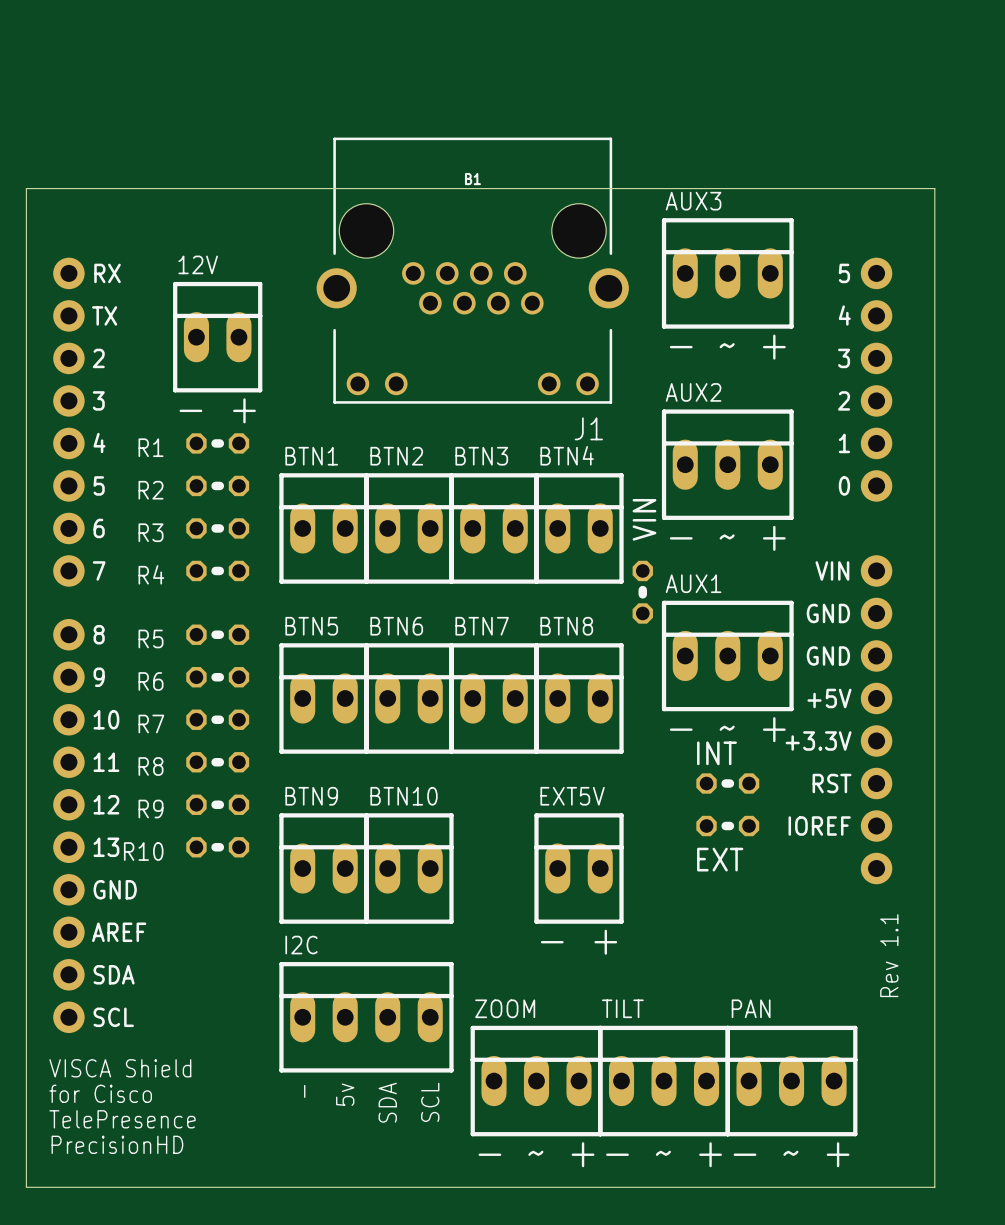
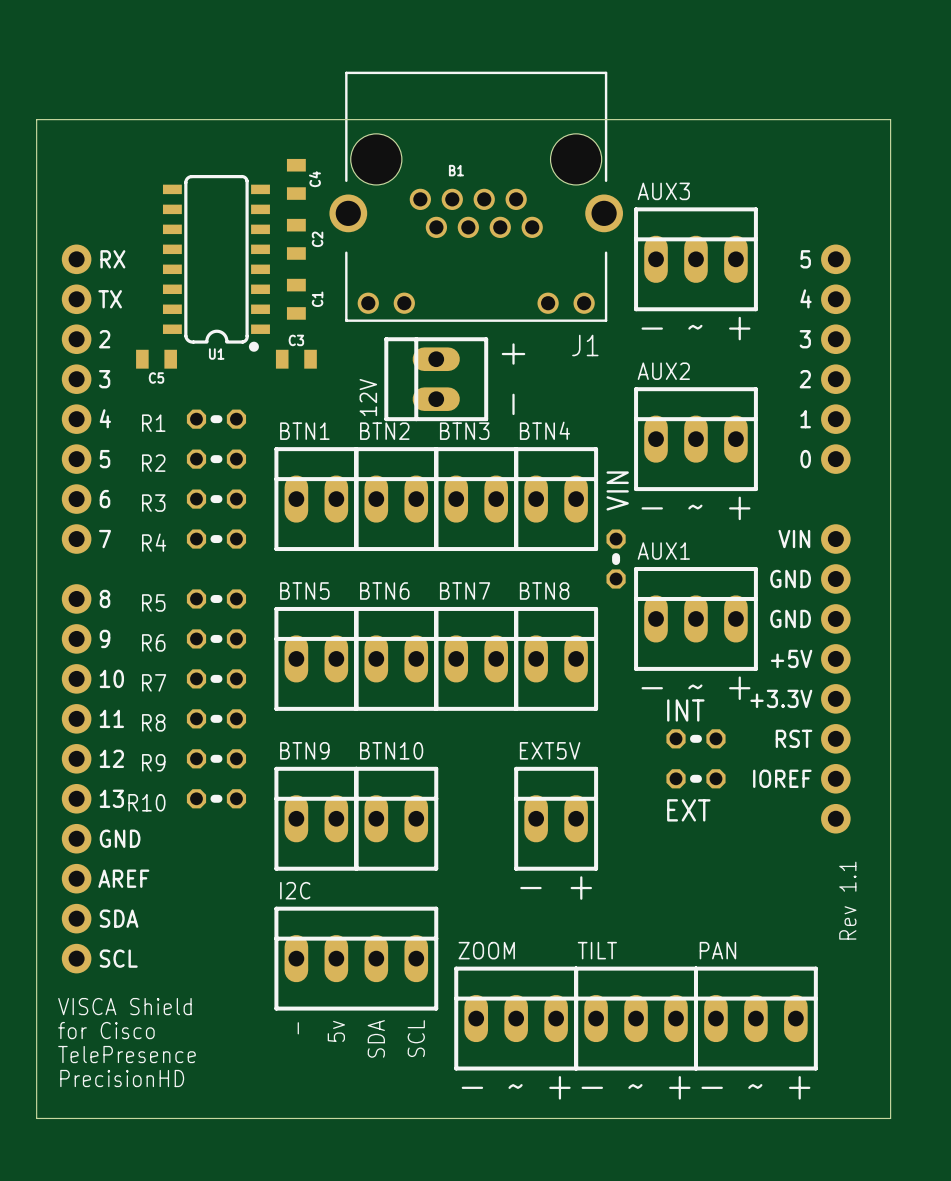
board edge: (26, 188) (934, 188) -> (36, 179) (36, 119) (890, 119) (890, 179)
C4: none -> (296, 179)
C2: none -> (296, 239)
J1 position: (472, 270) -> (476, 196)
U1: none -> (216, 263)
C1: none -> (296, 299)
12V rotation: 0° (217, 337) -> 90° counterclockwise (436, 379)
12V position: (217, 337) -> (436, 379)
C5: none -> (156, 359)
C3: none -> (296, 359)
text rotation: 0° (217, 410) -> 90° counterclockwise (513, 379)
text position: - + (217, 410) -> - + (513, 379)

